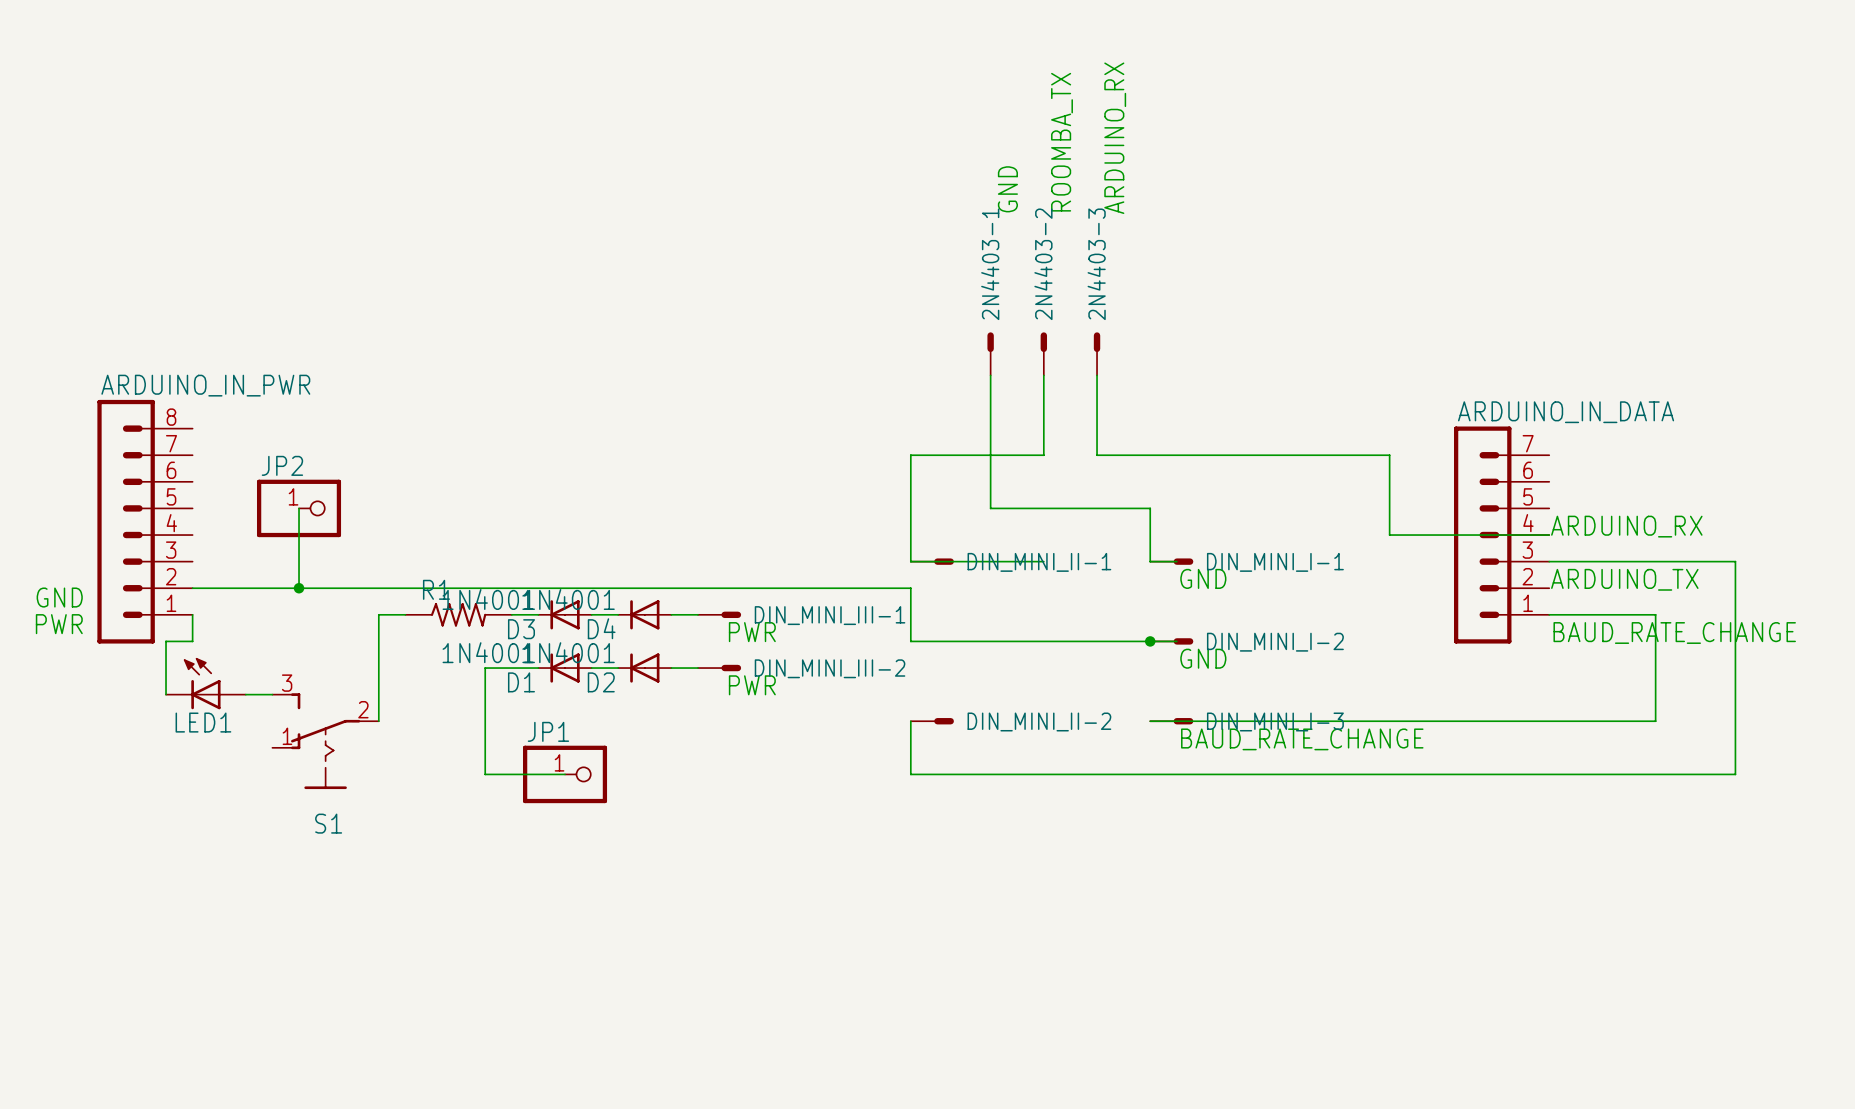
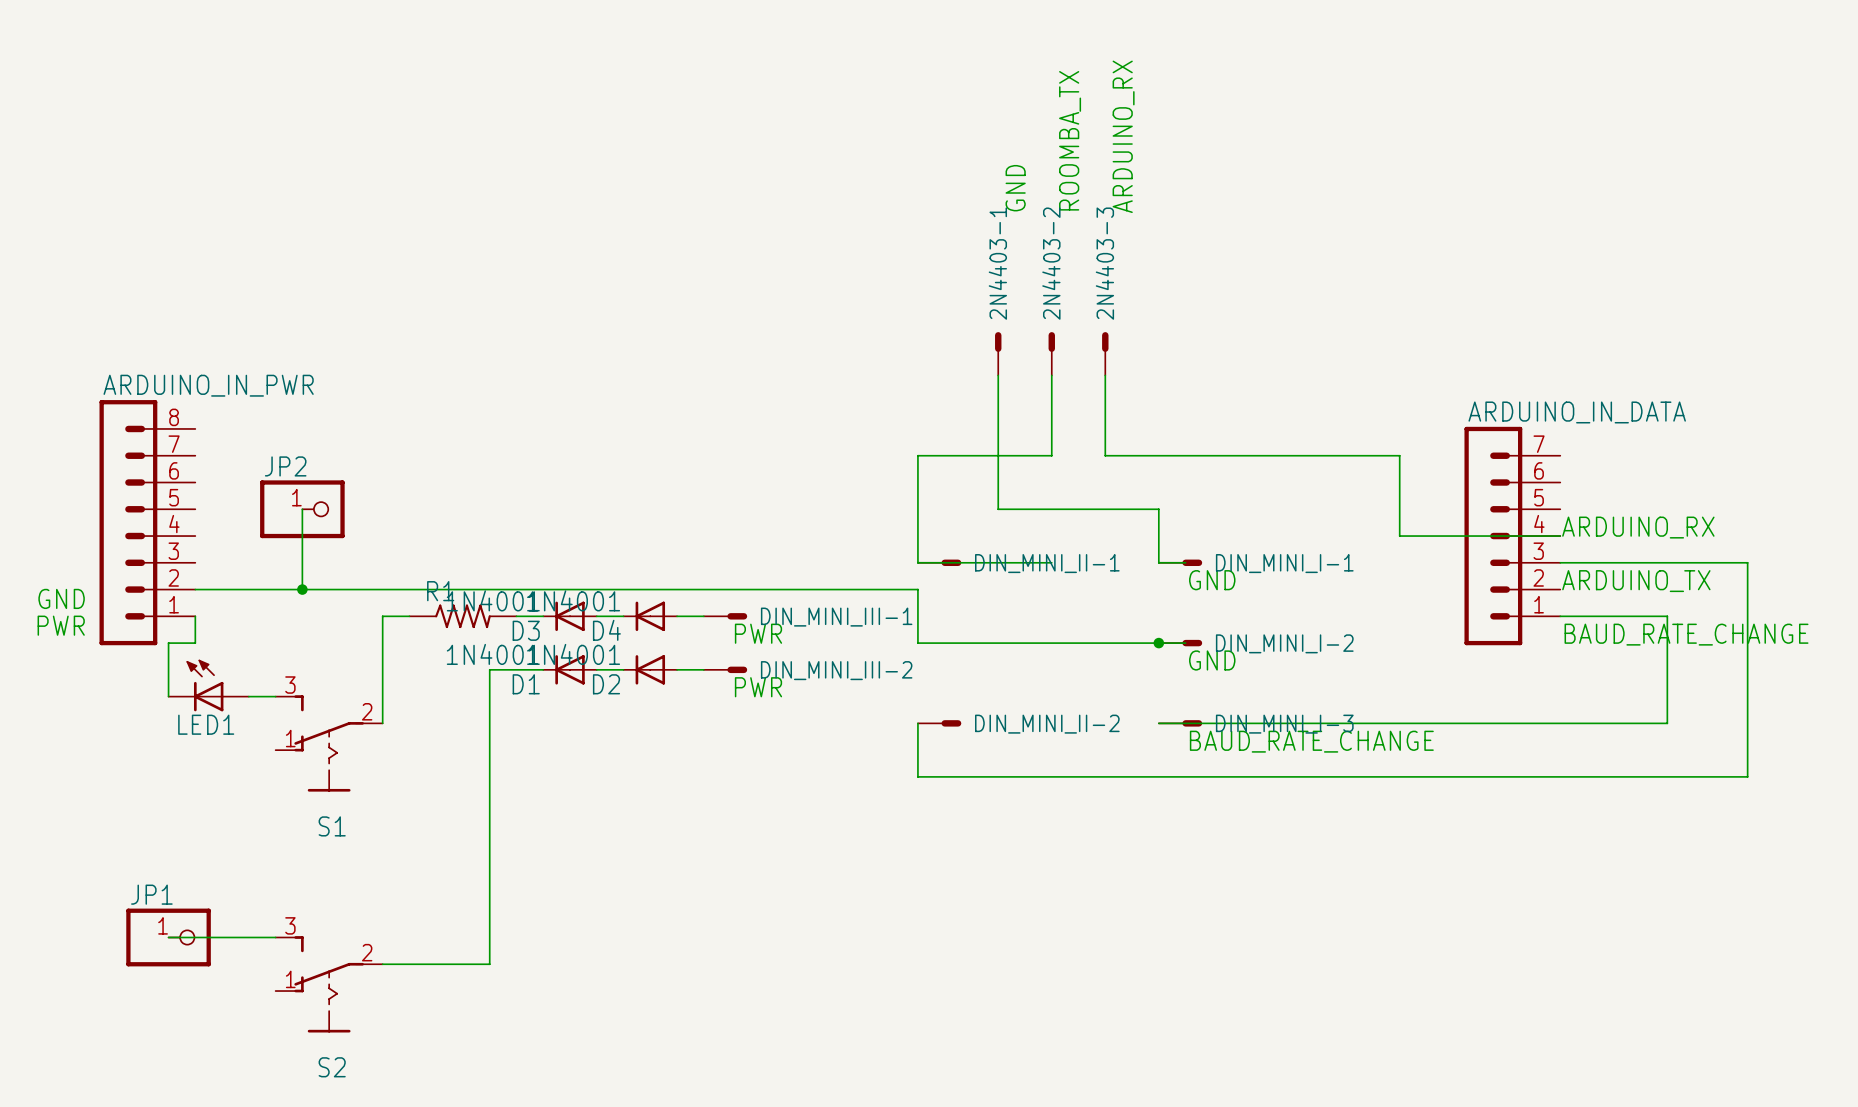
wire: (485, 774) (565, 774) -> (489, 776) (489, 964) (382, 964)
JP1 position: (565, 774) -> (168, 937)
wire: none -> (168, 937) (275, 937)
S2: none -> (329, 984)

